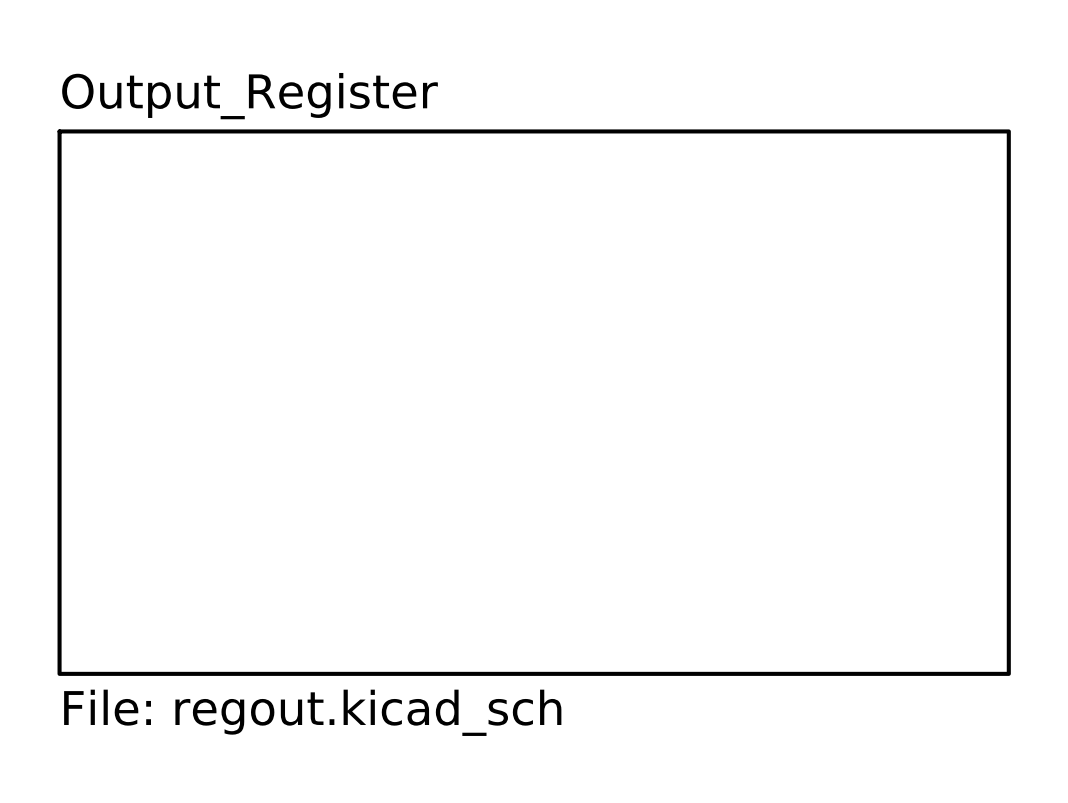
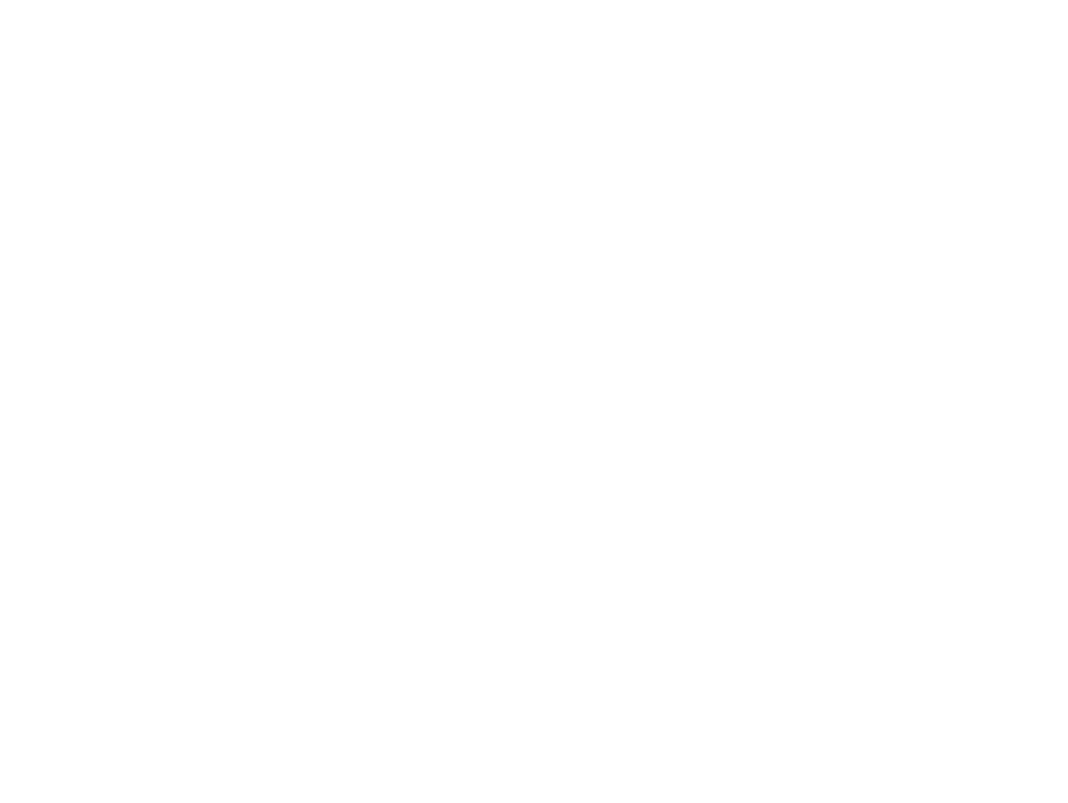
sheet Output_Register: File: regout.kicad_sch (534, 402) -> none

